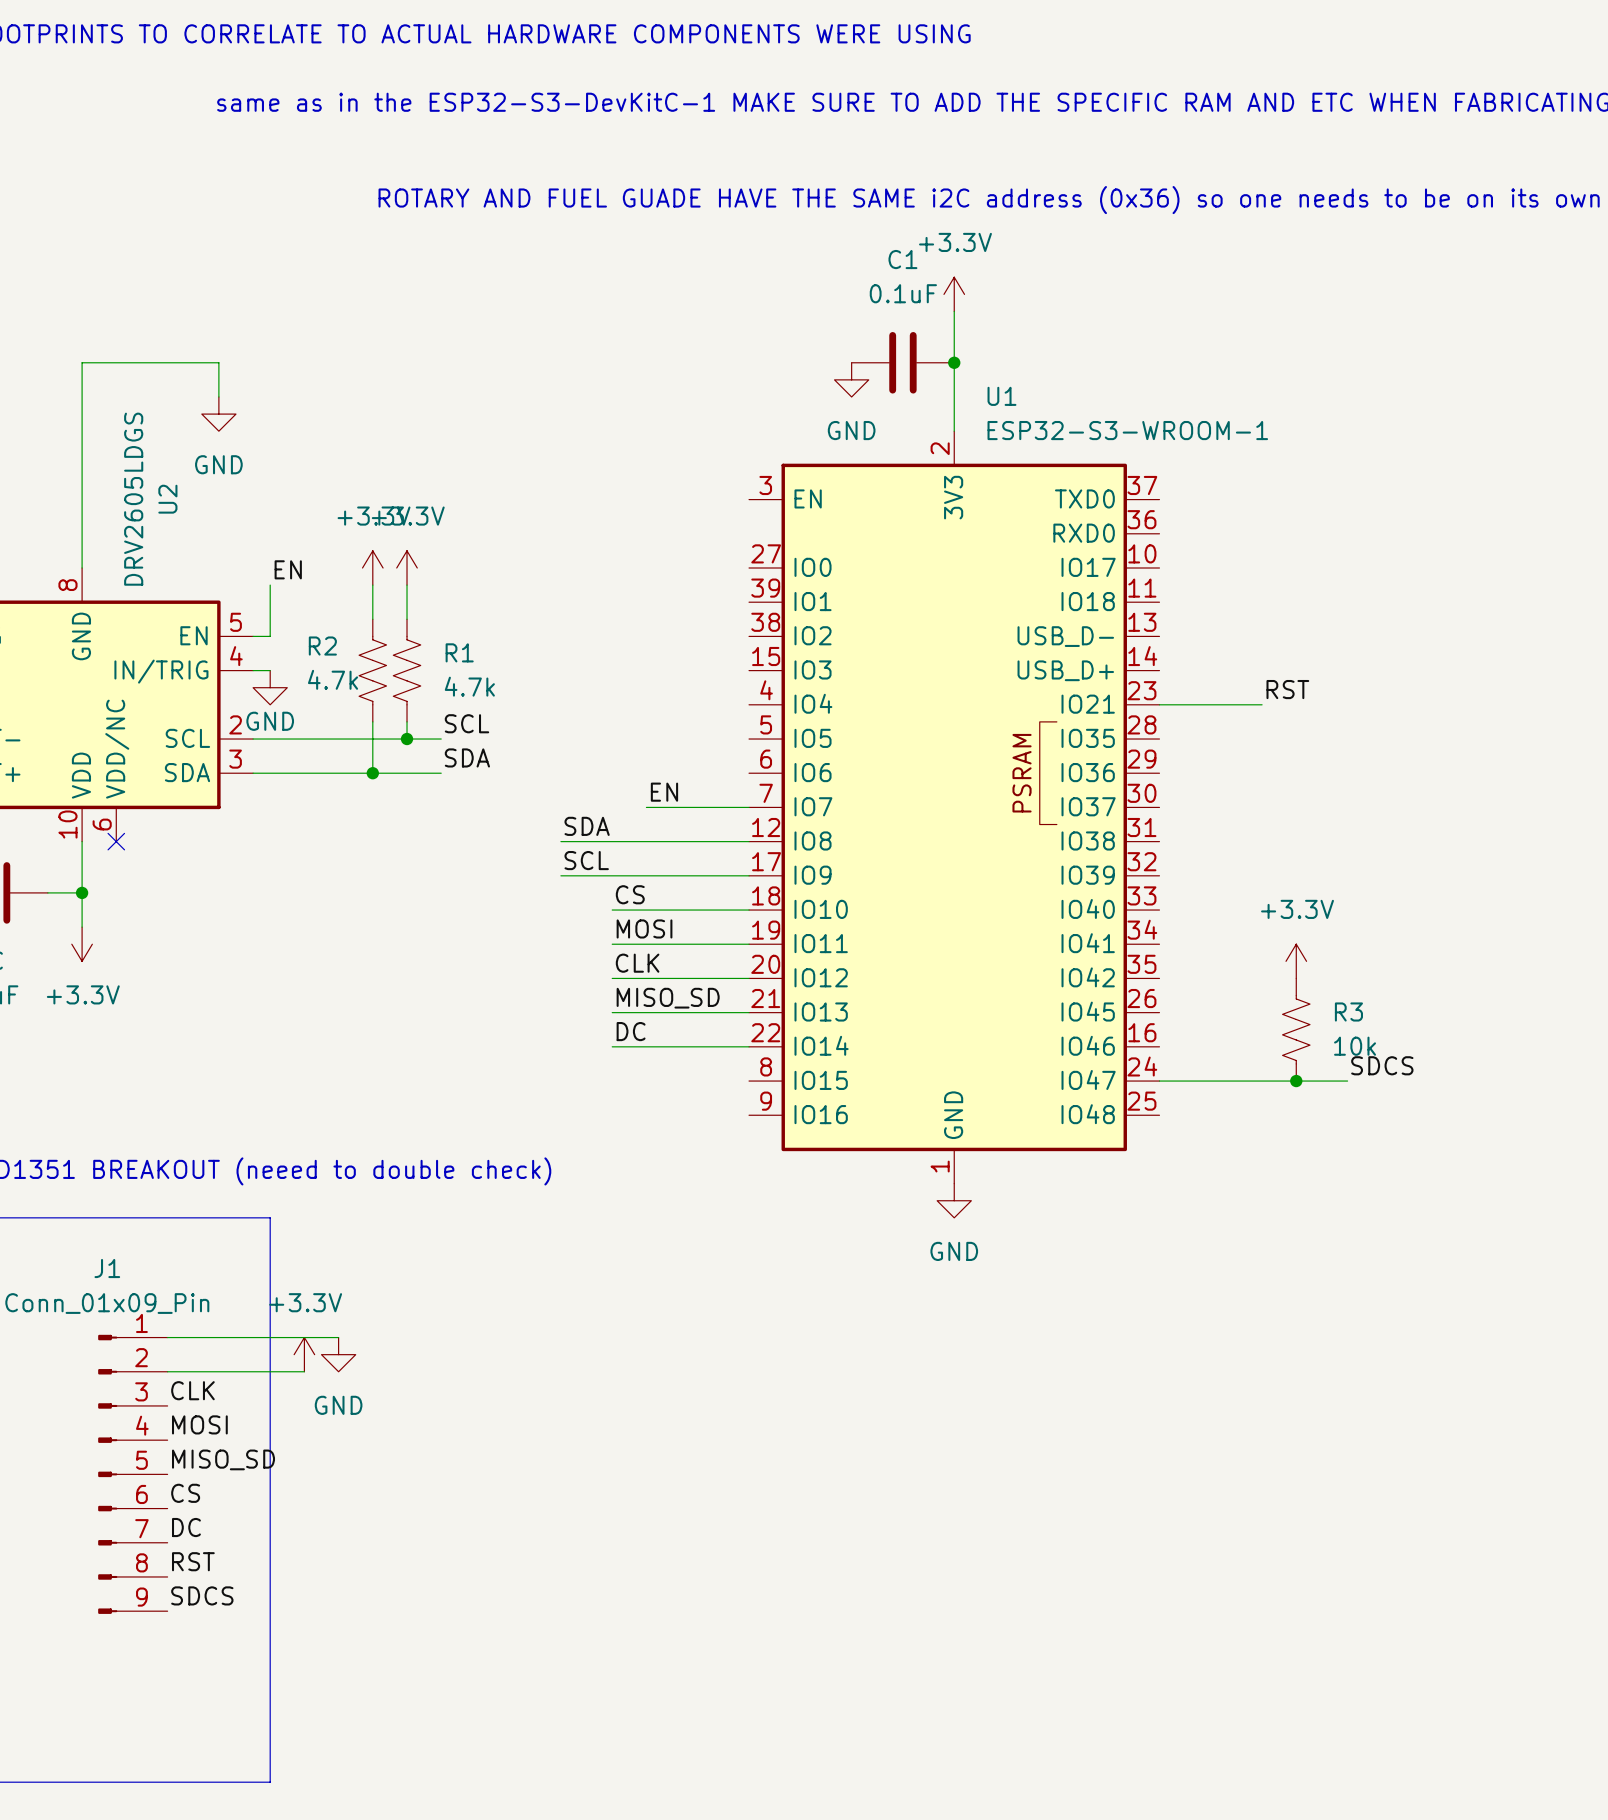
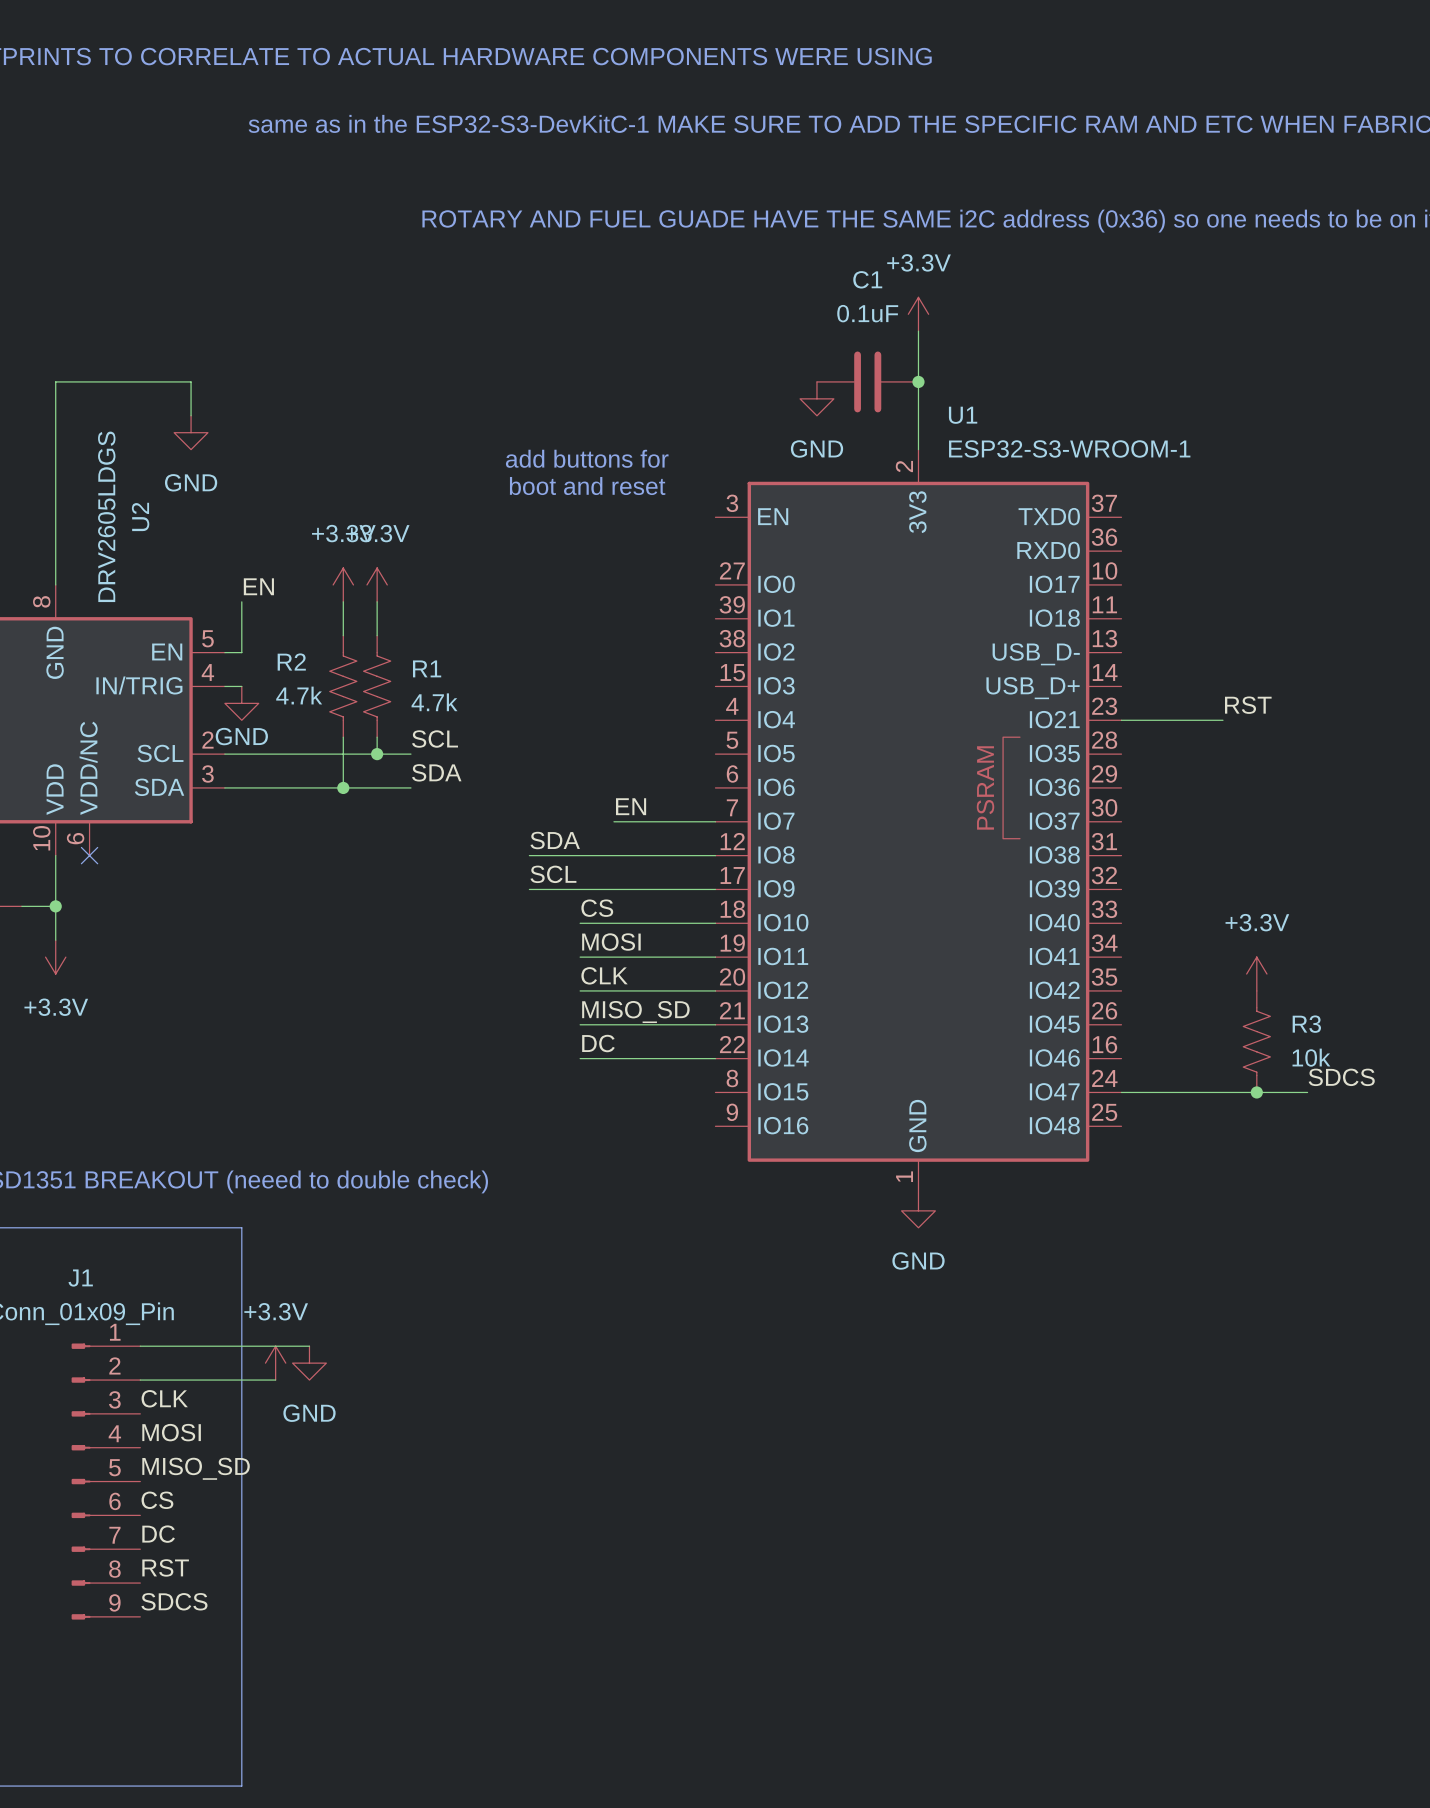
text: none -> add buttons for (587, 458)
text: none -> boot and reset (587, 486)

